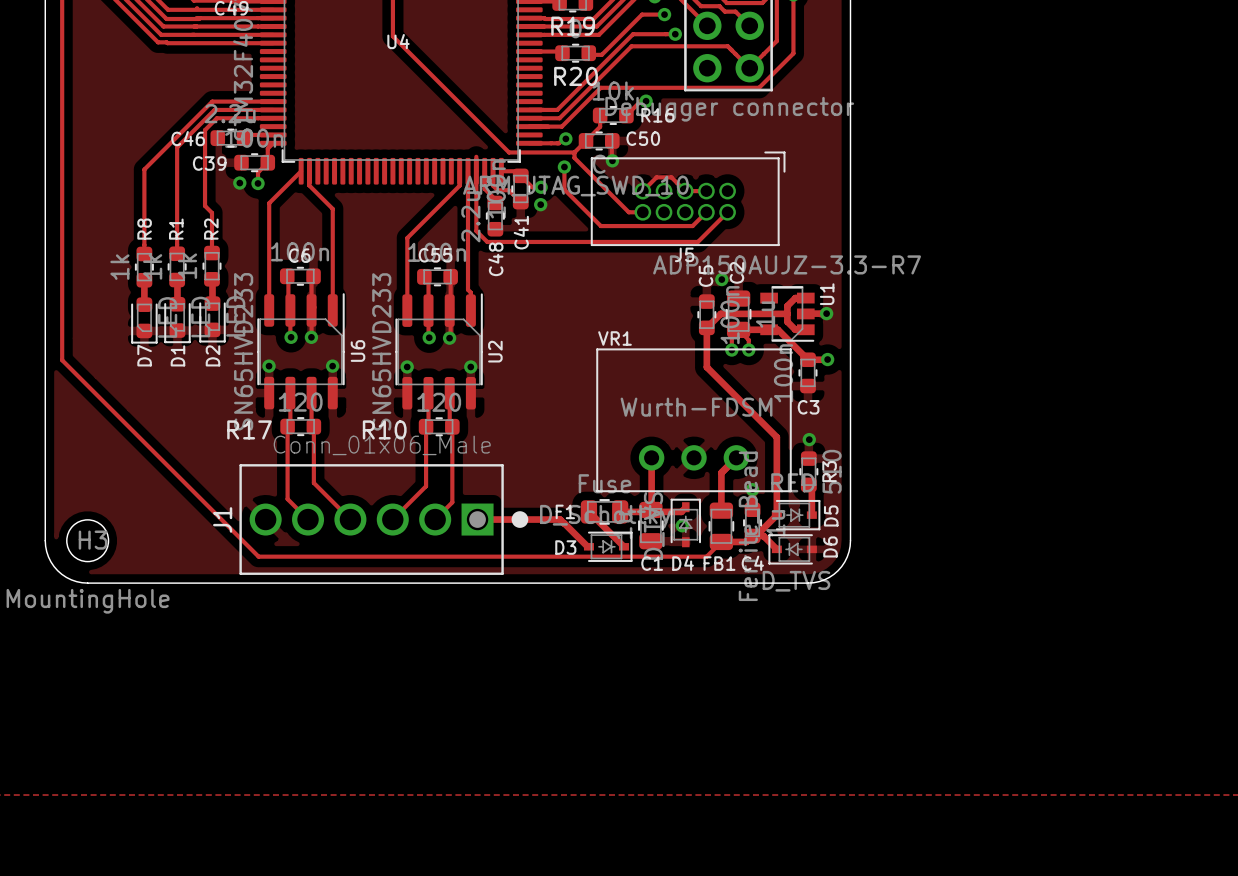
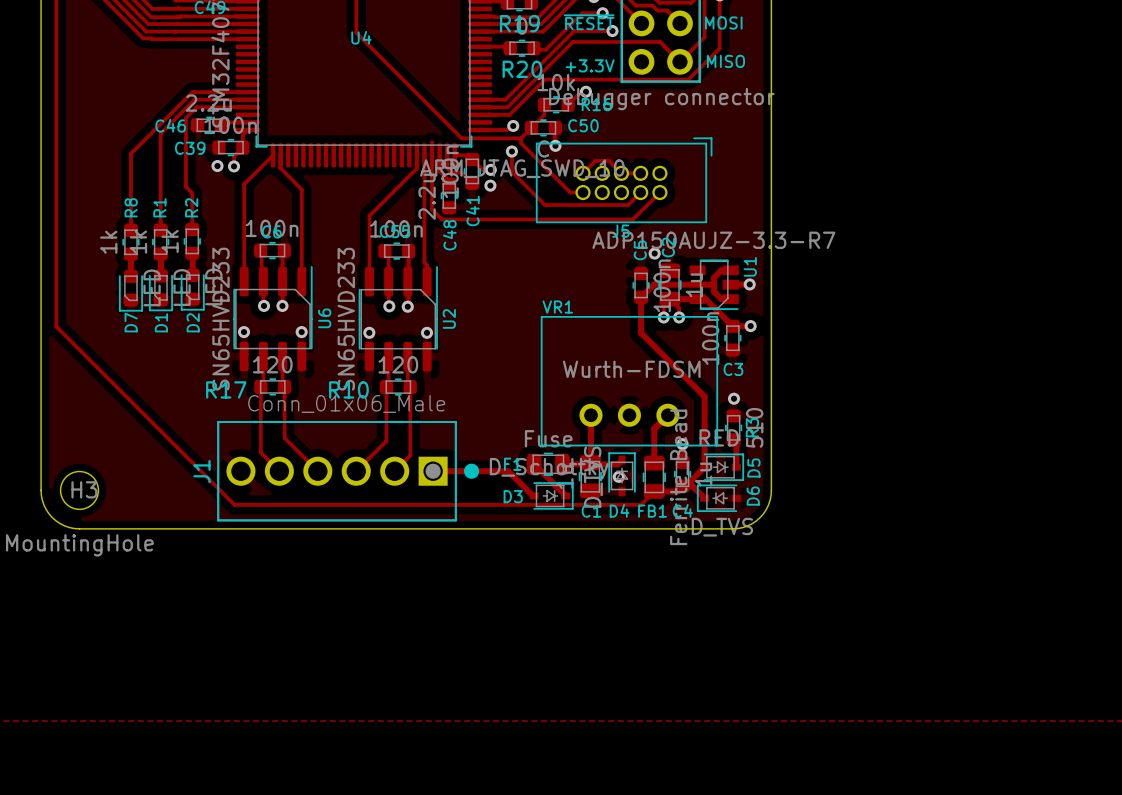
text: none -> ~{RESET} (589, 22)
text: none -> MOSI (723, 22)
text: none -> MISO (725, 61)
text: none -> +3.3V (590, 65)

